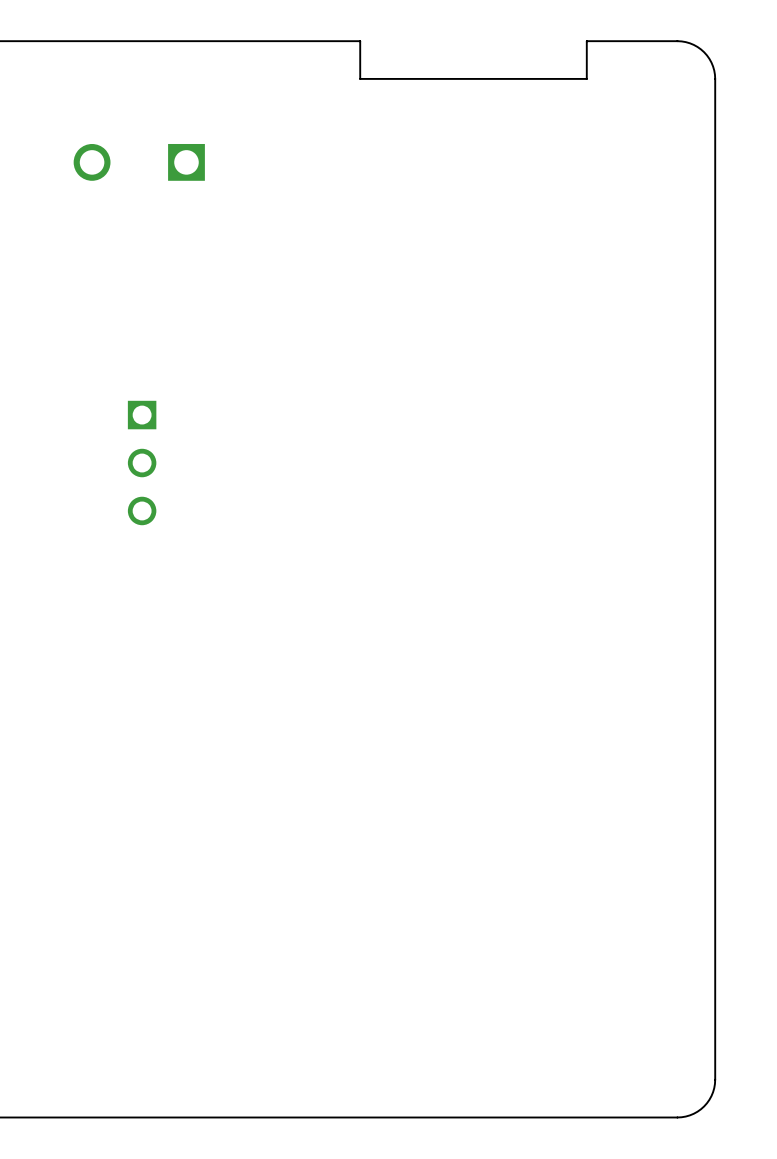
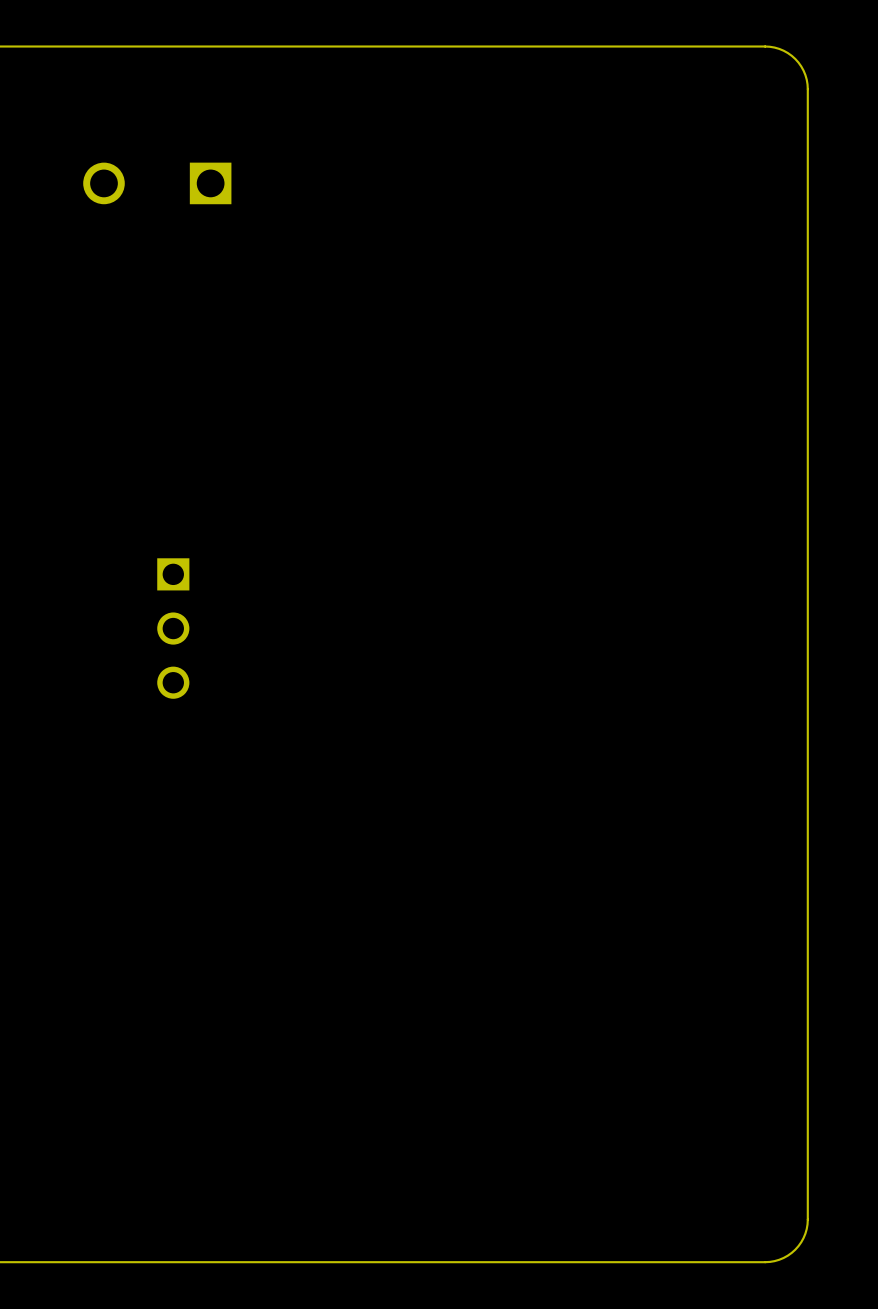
board edge: (586, 41) (586, 78) (360, 78) (360, 41) -> (662, 46) (406, 46)
part position: (142, 463) -> (173, 628)

